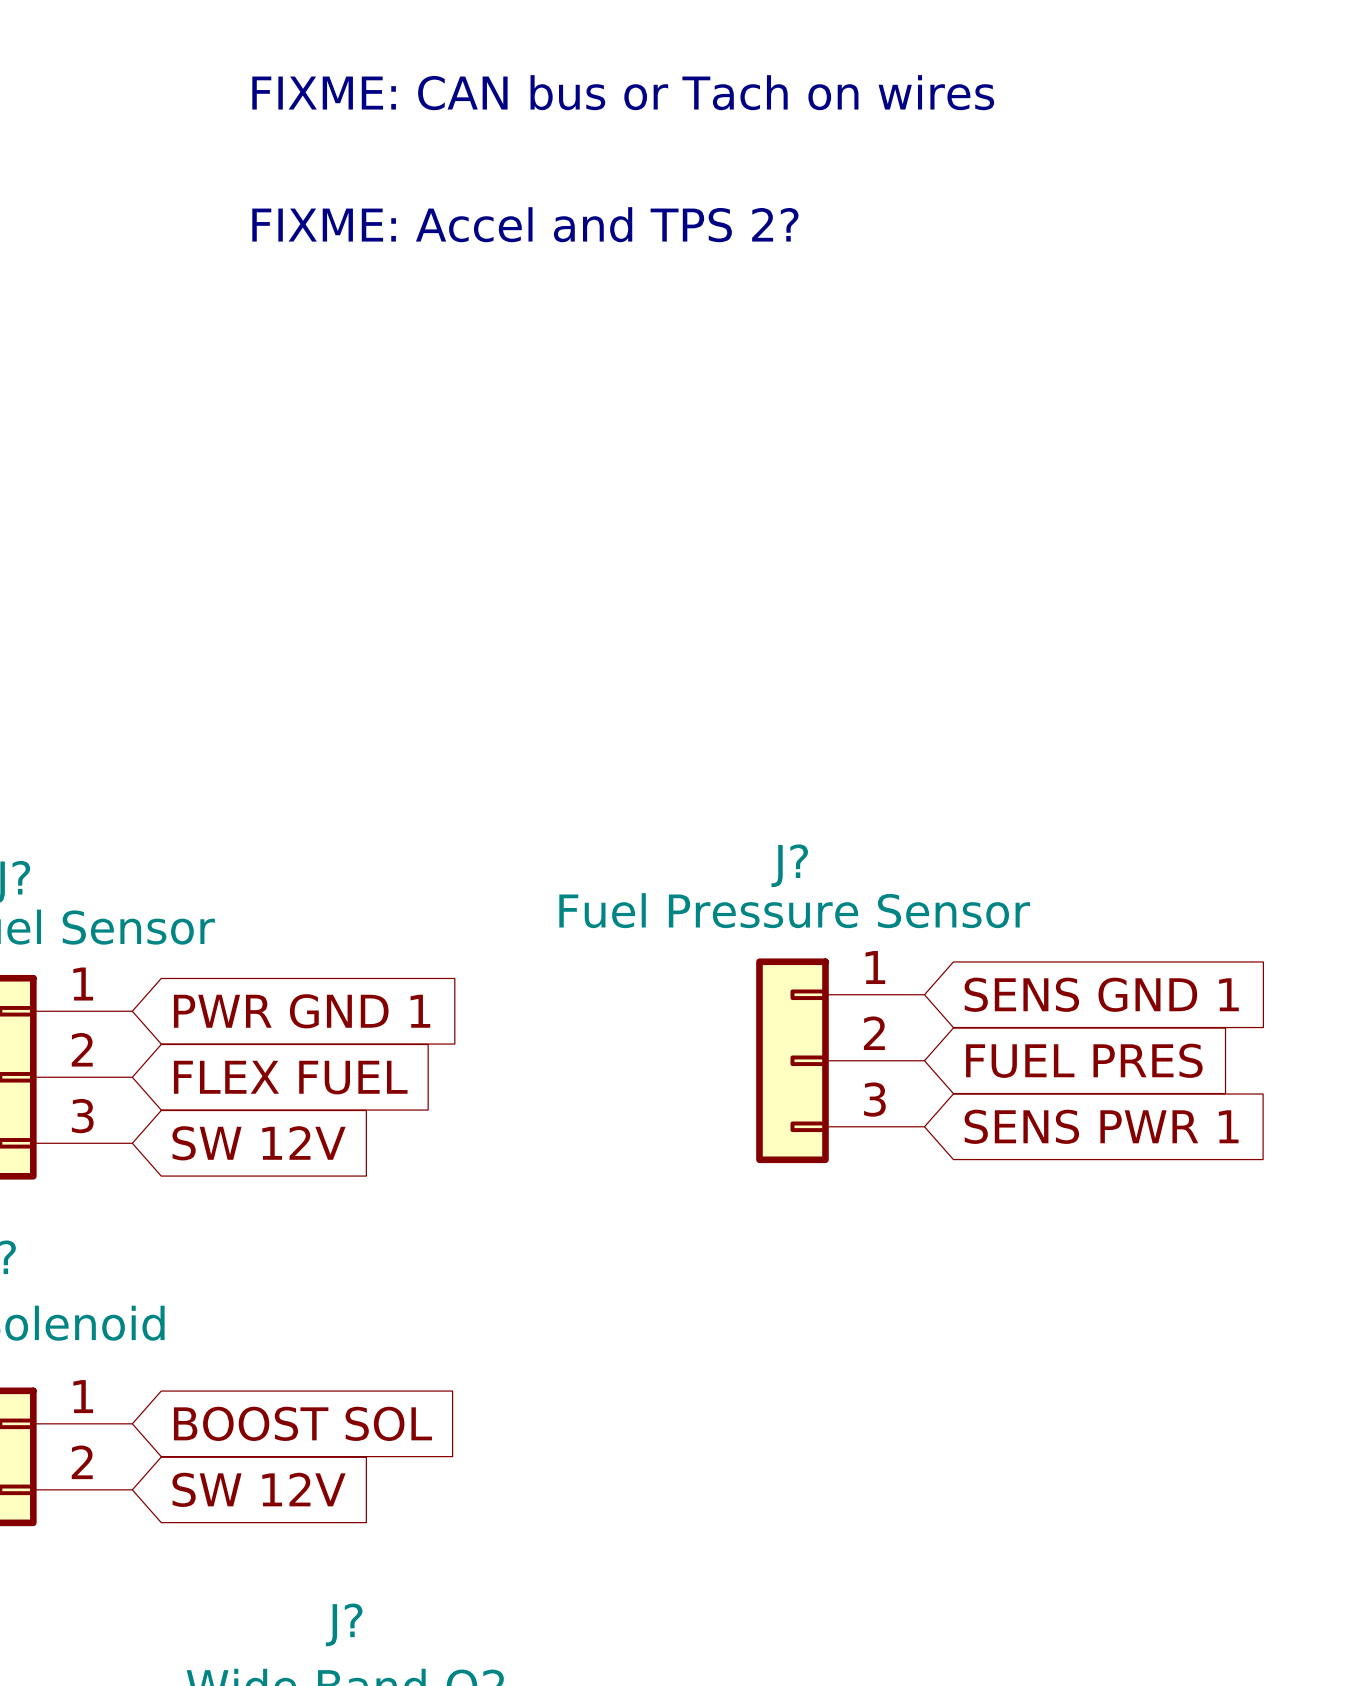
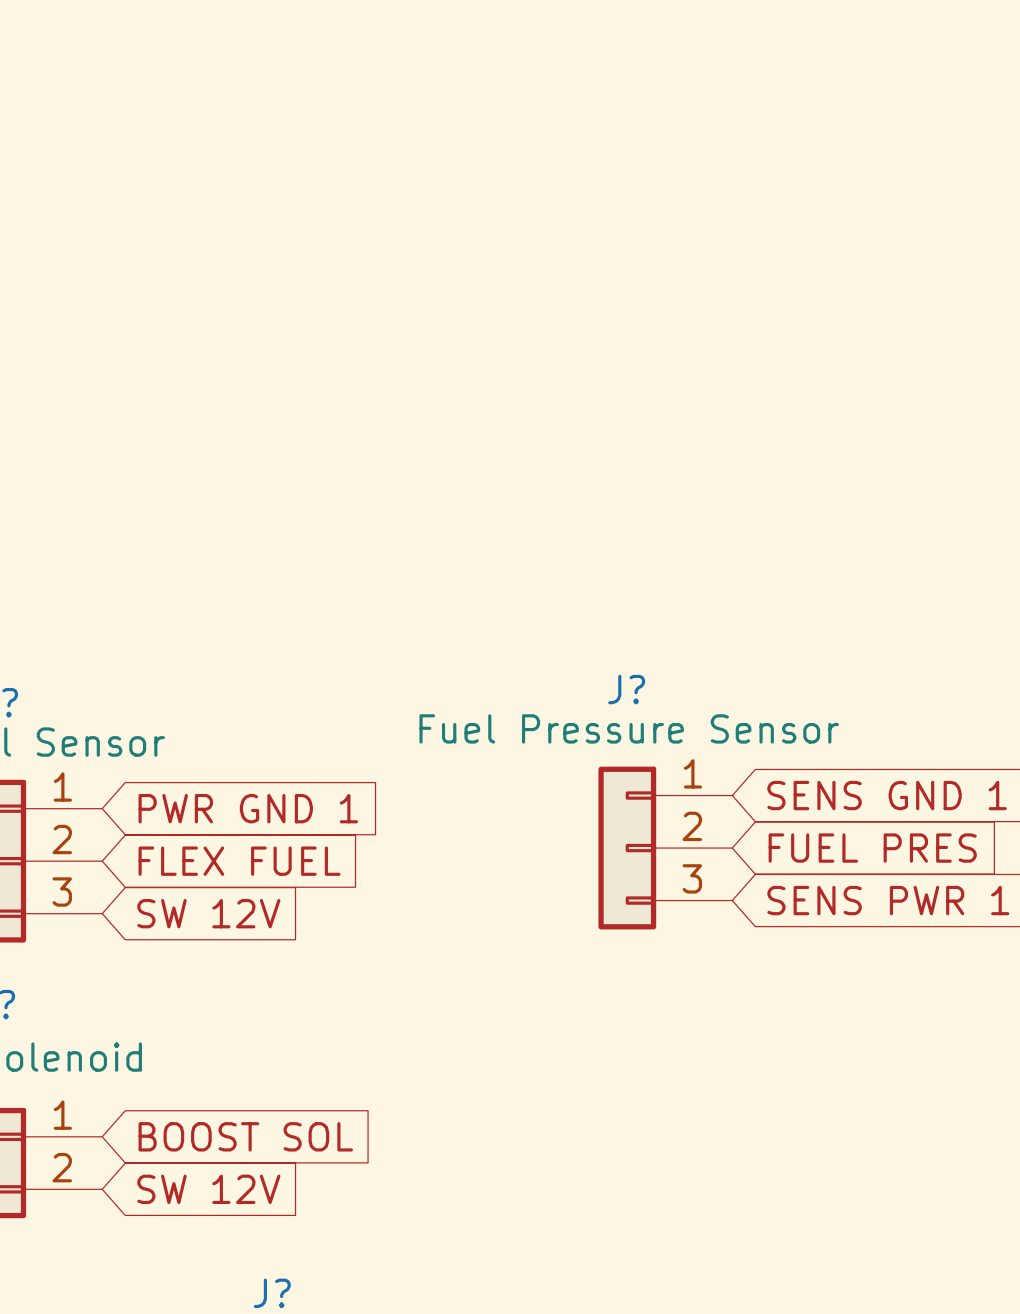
text: FIXME: CAN bus or Tach on wires (623, 92) -> none
text: FIXME: Accel and TPS 2? (525, 224) -> none

